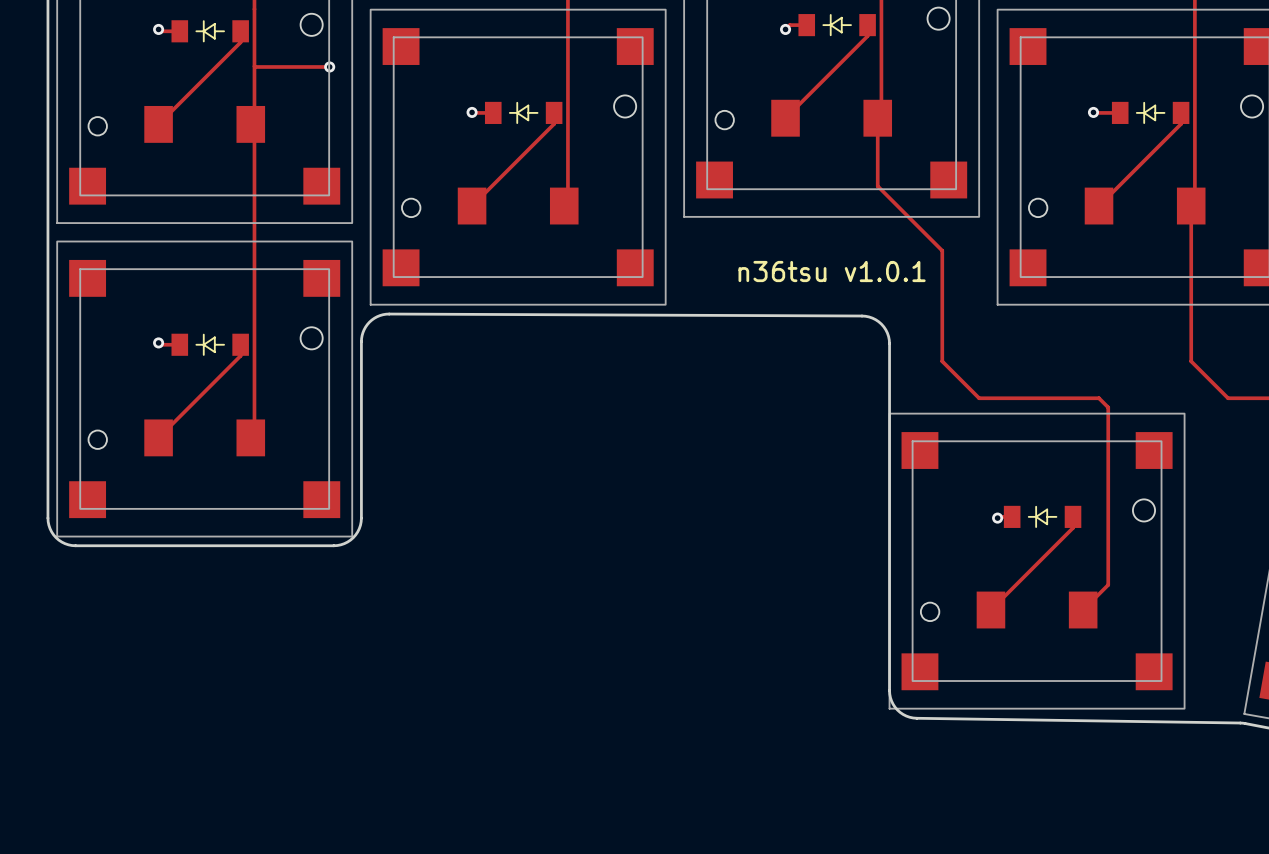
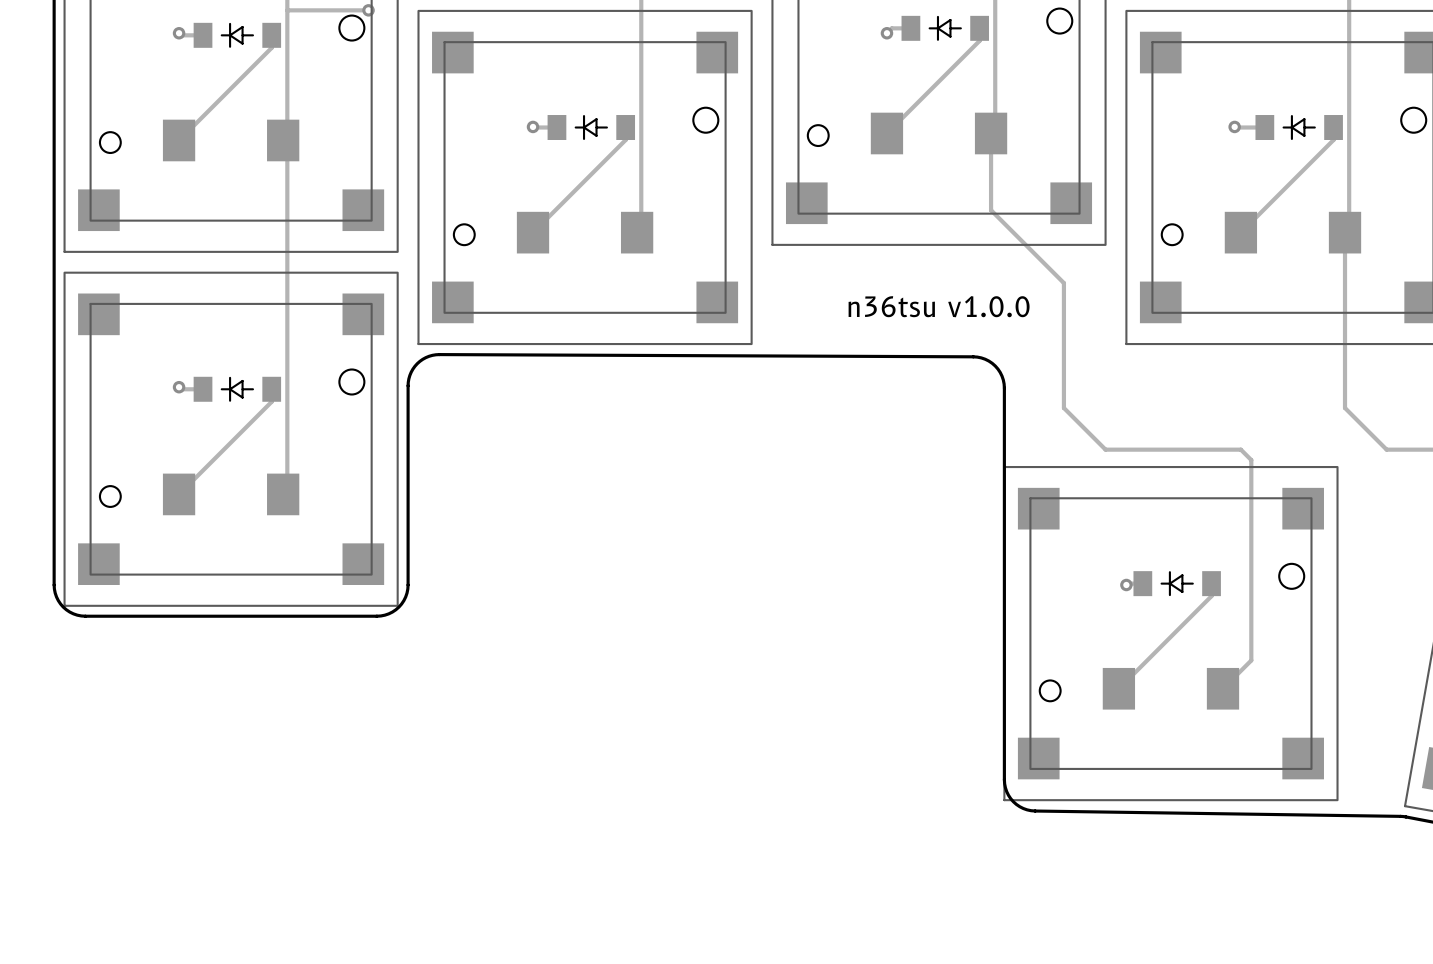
track: none -> (287, 10) (368, 10)
track: (254, 66) (329, 66) -> none
via position: (329, 66) -> (368, 10)
text: n36tsu v1.0.1 (832, 271) -> n36tsu v1.0.0 (939, 306)

